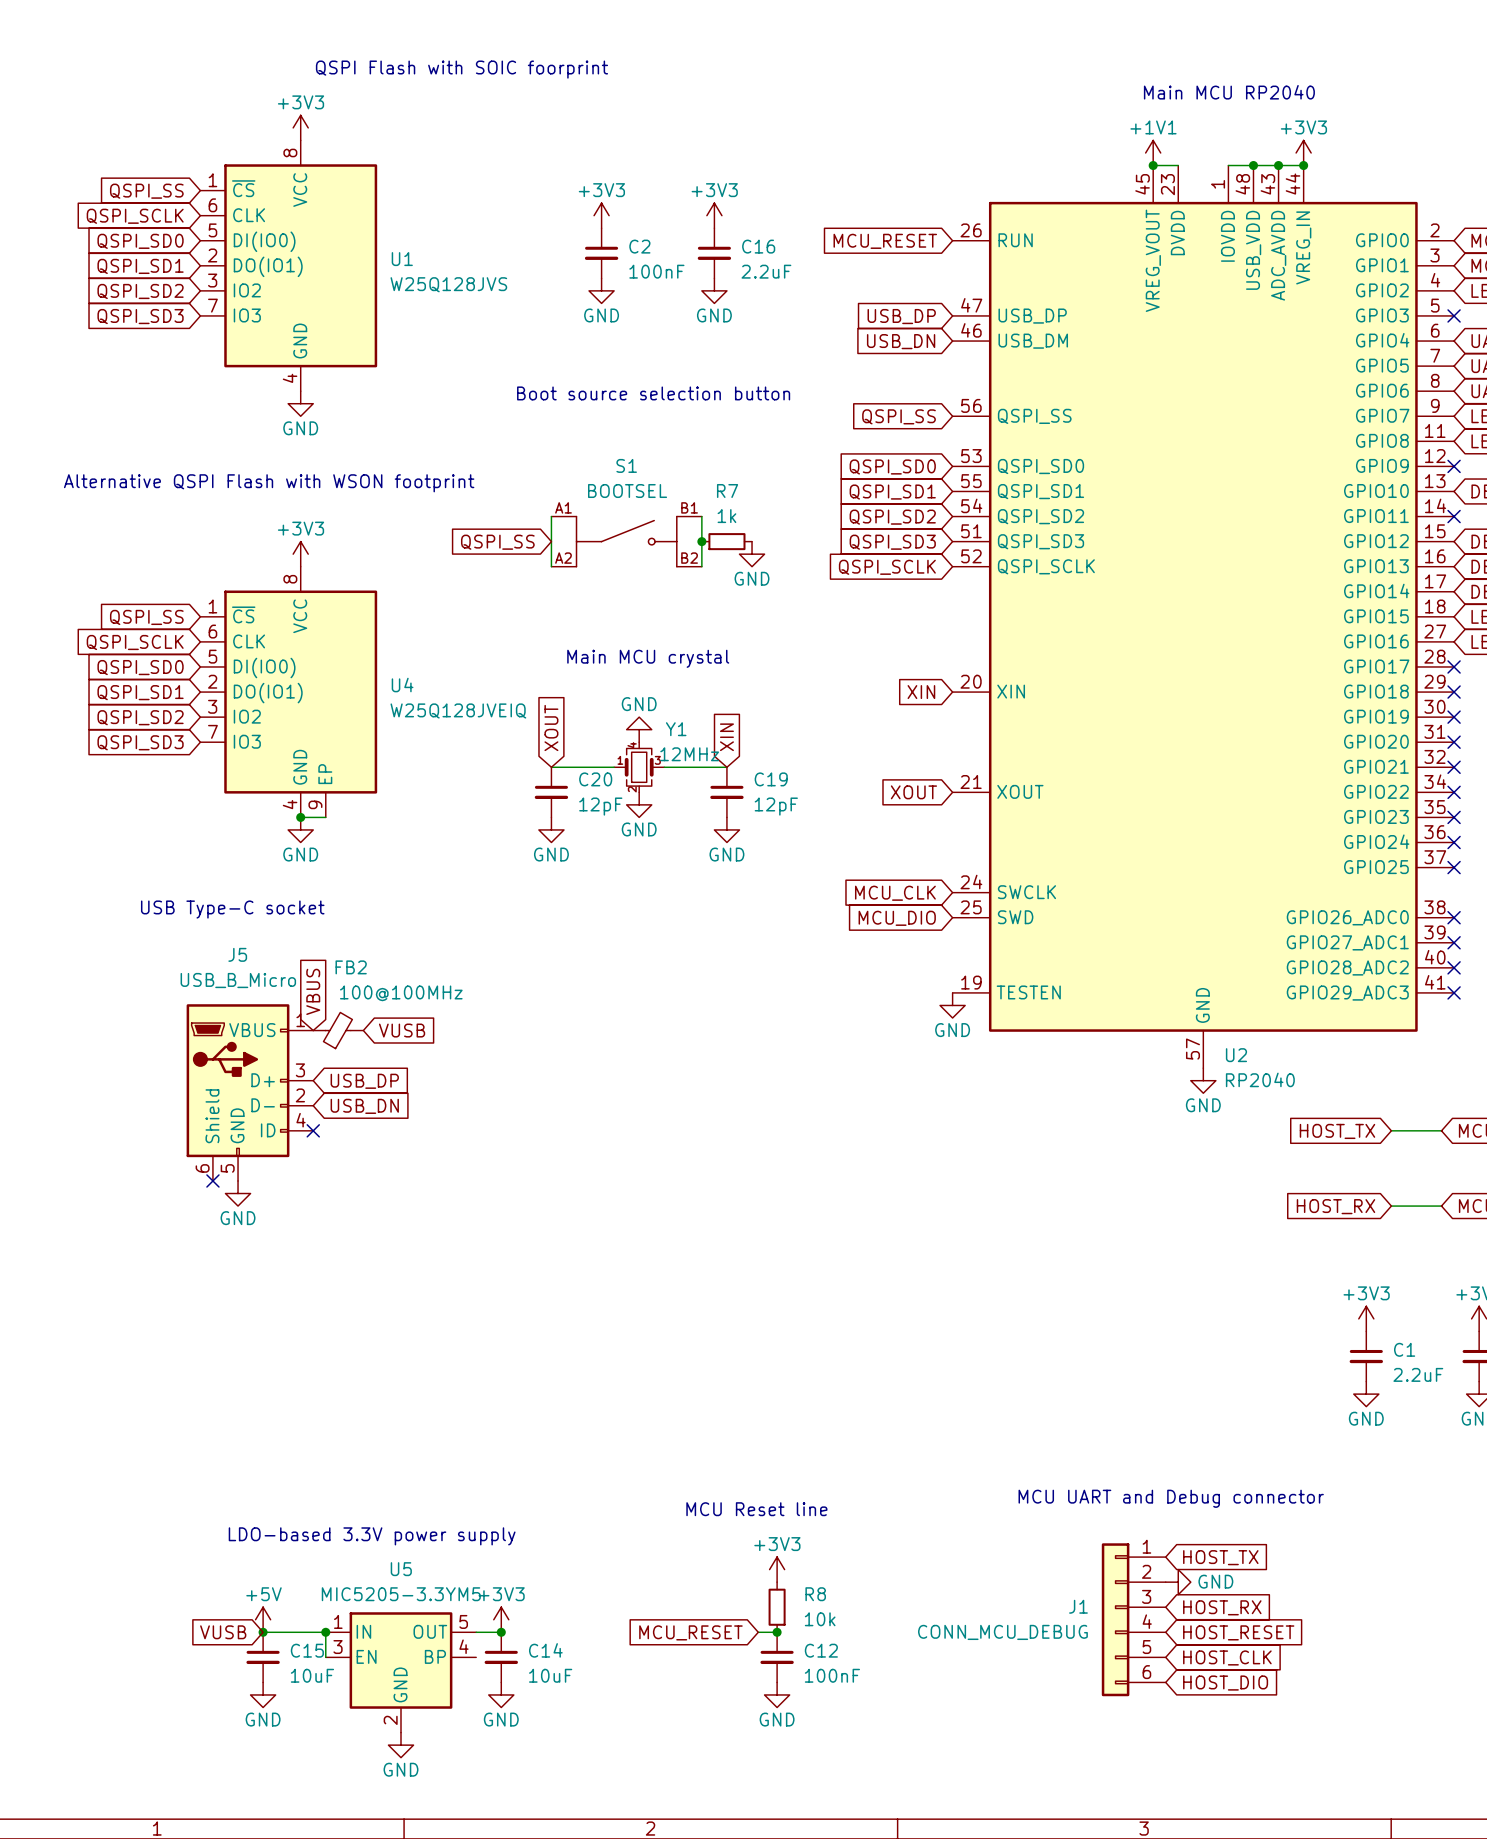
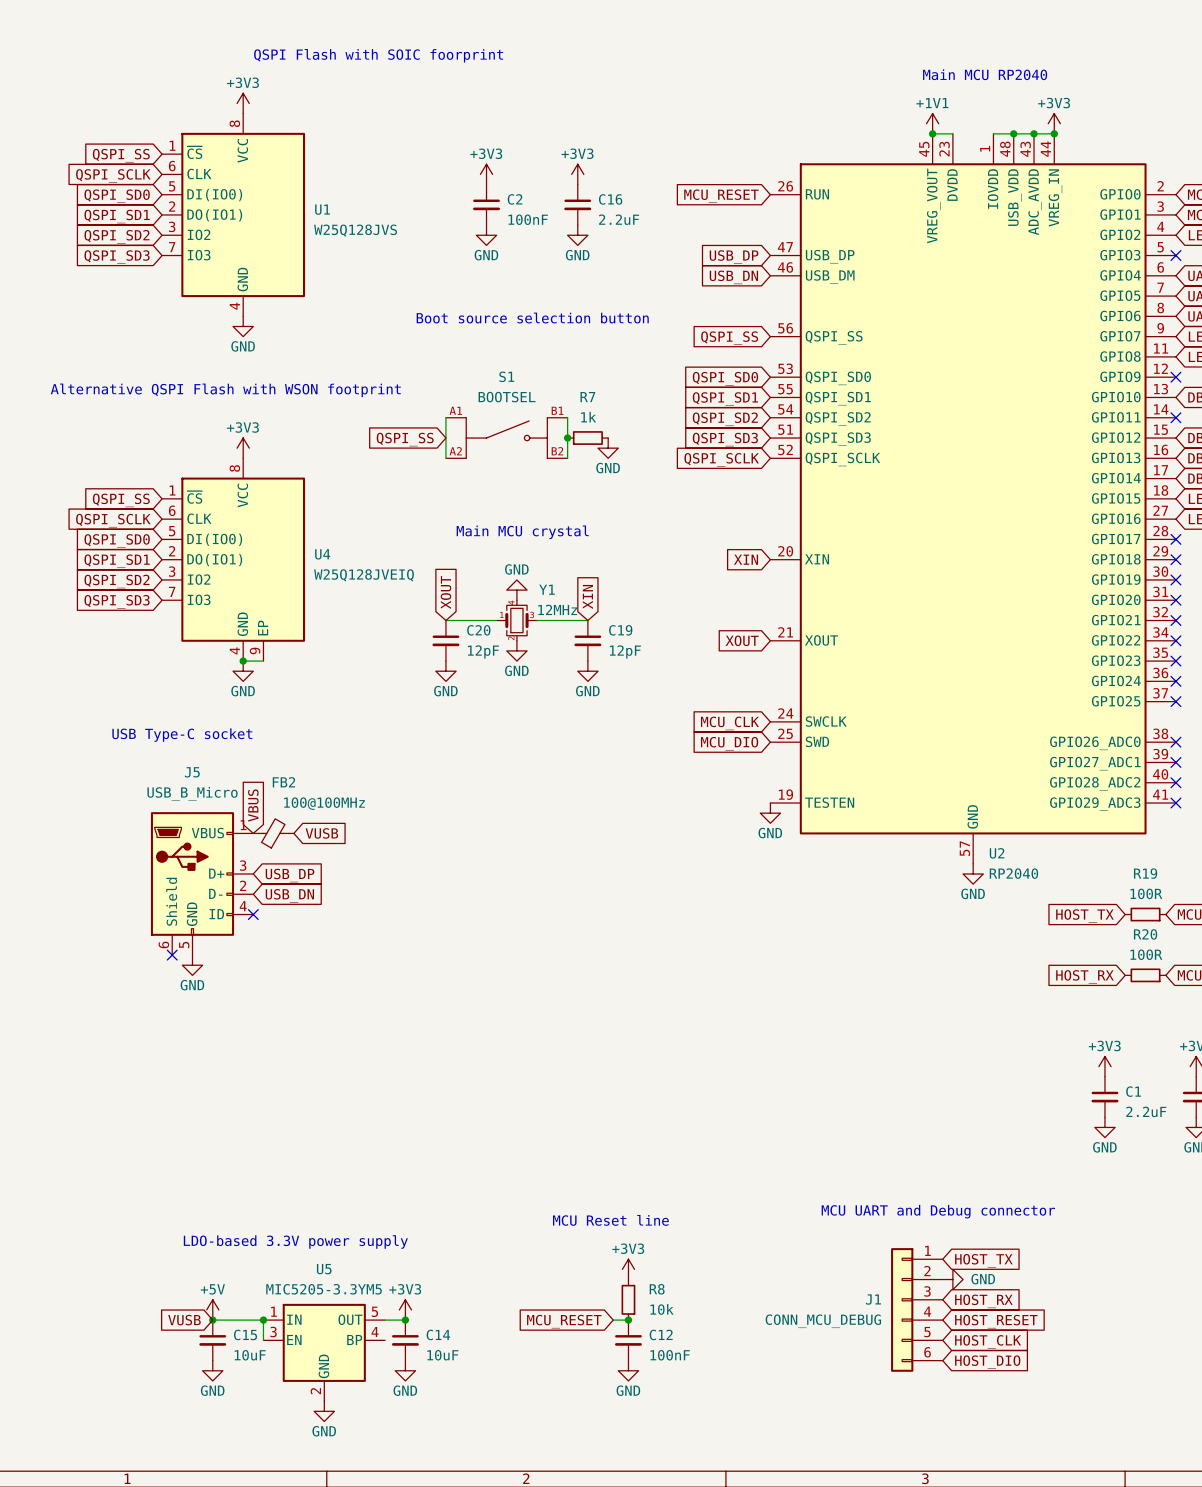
wire: (1391, 1130) (1441, 1130) -> none
R19: none -> 100R (1145, 914)
wire: (1391, 1206) (1441, 1206) -> none
R20: none -> 100R (1145, 975)

